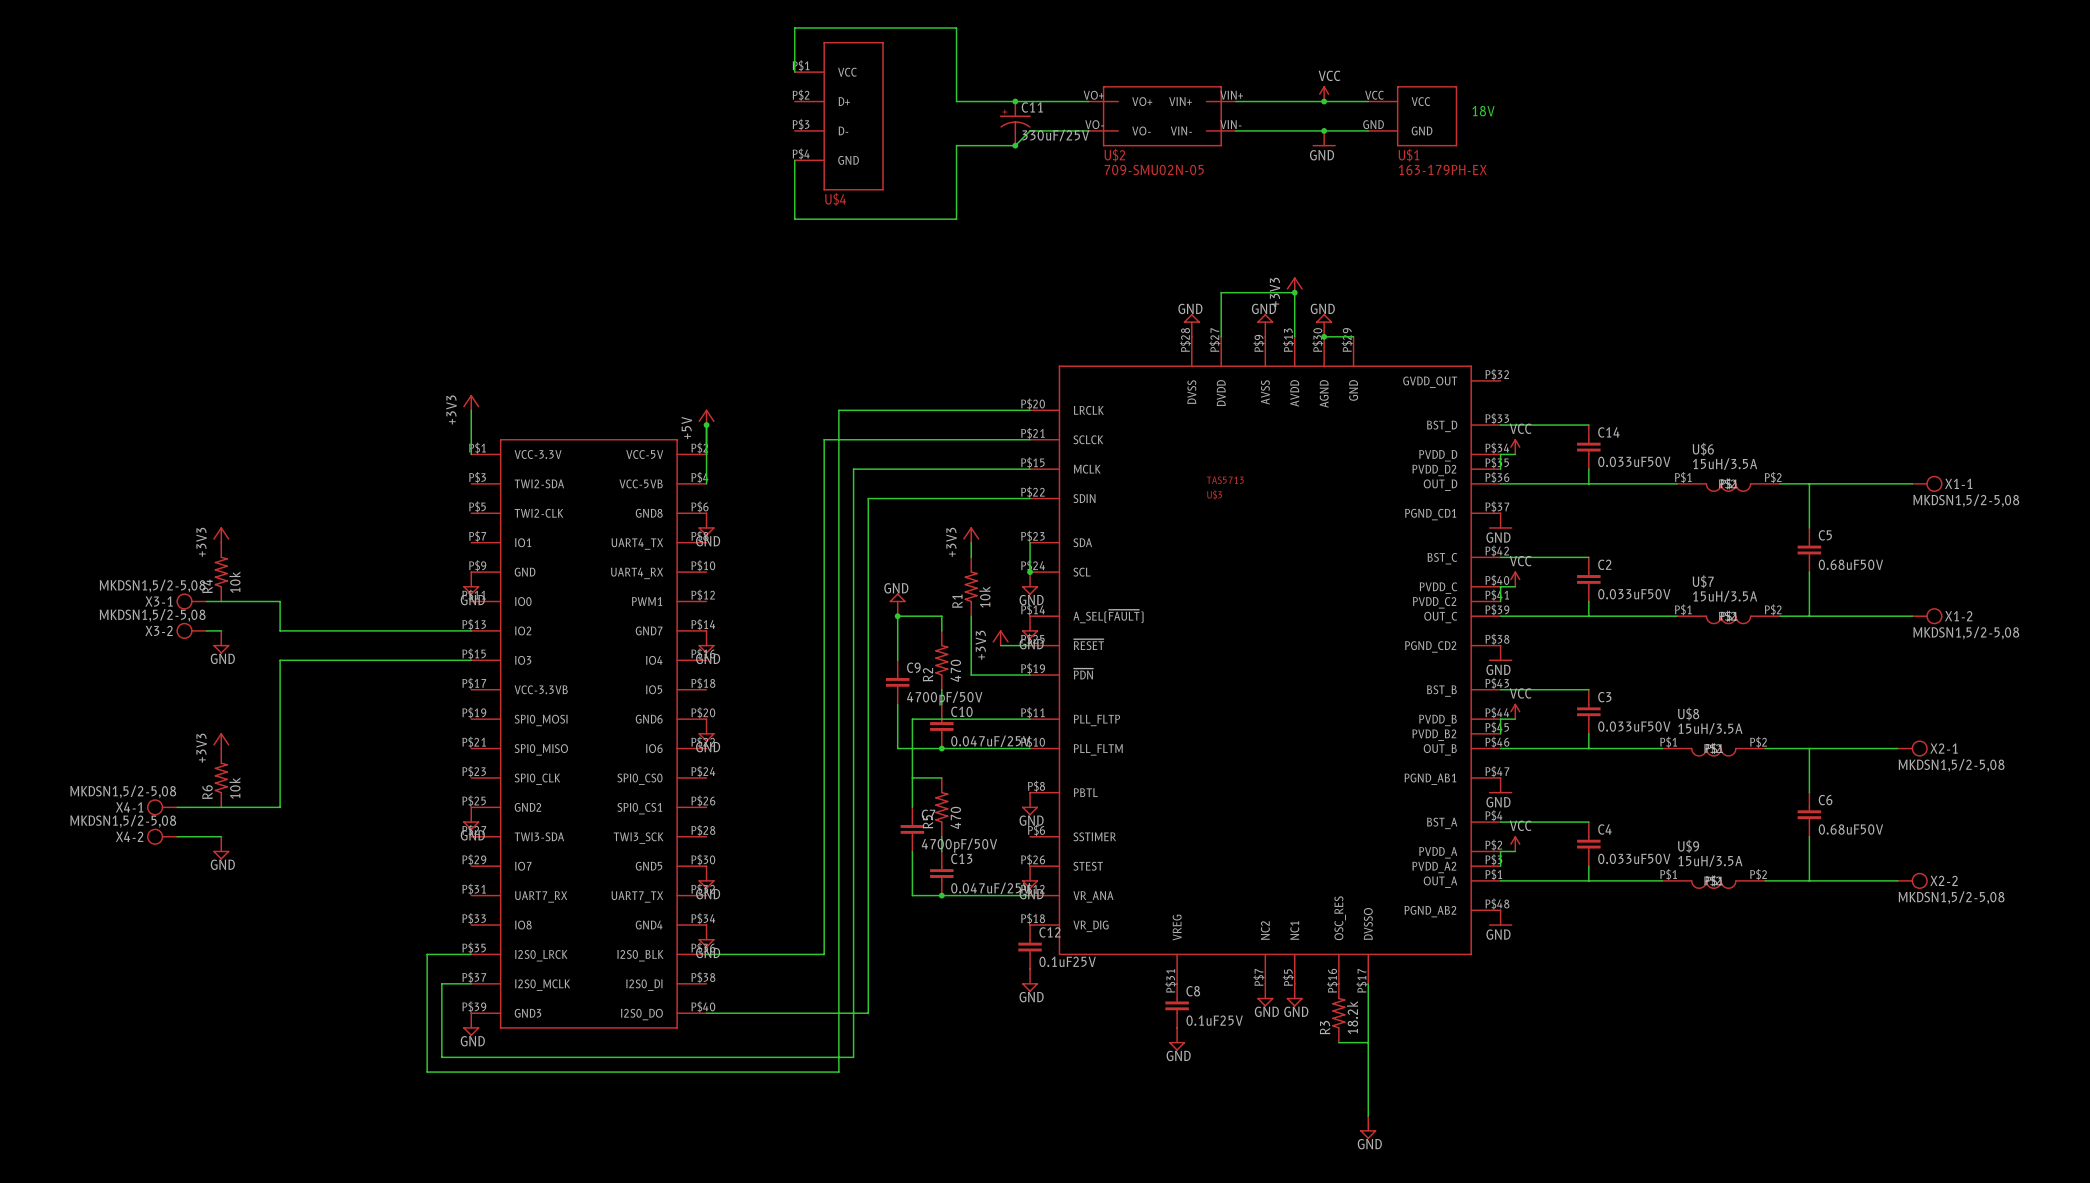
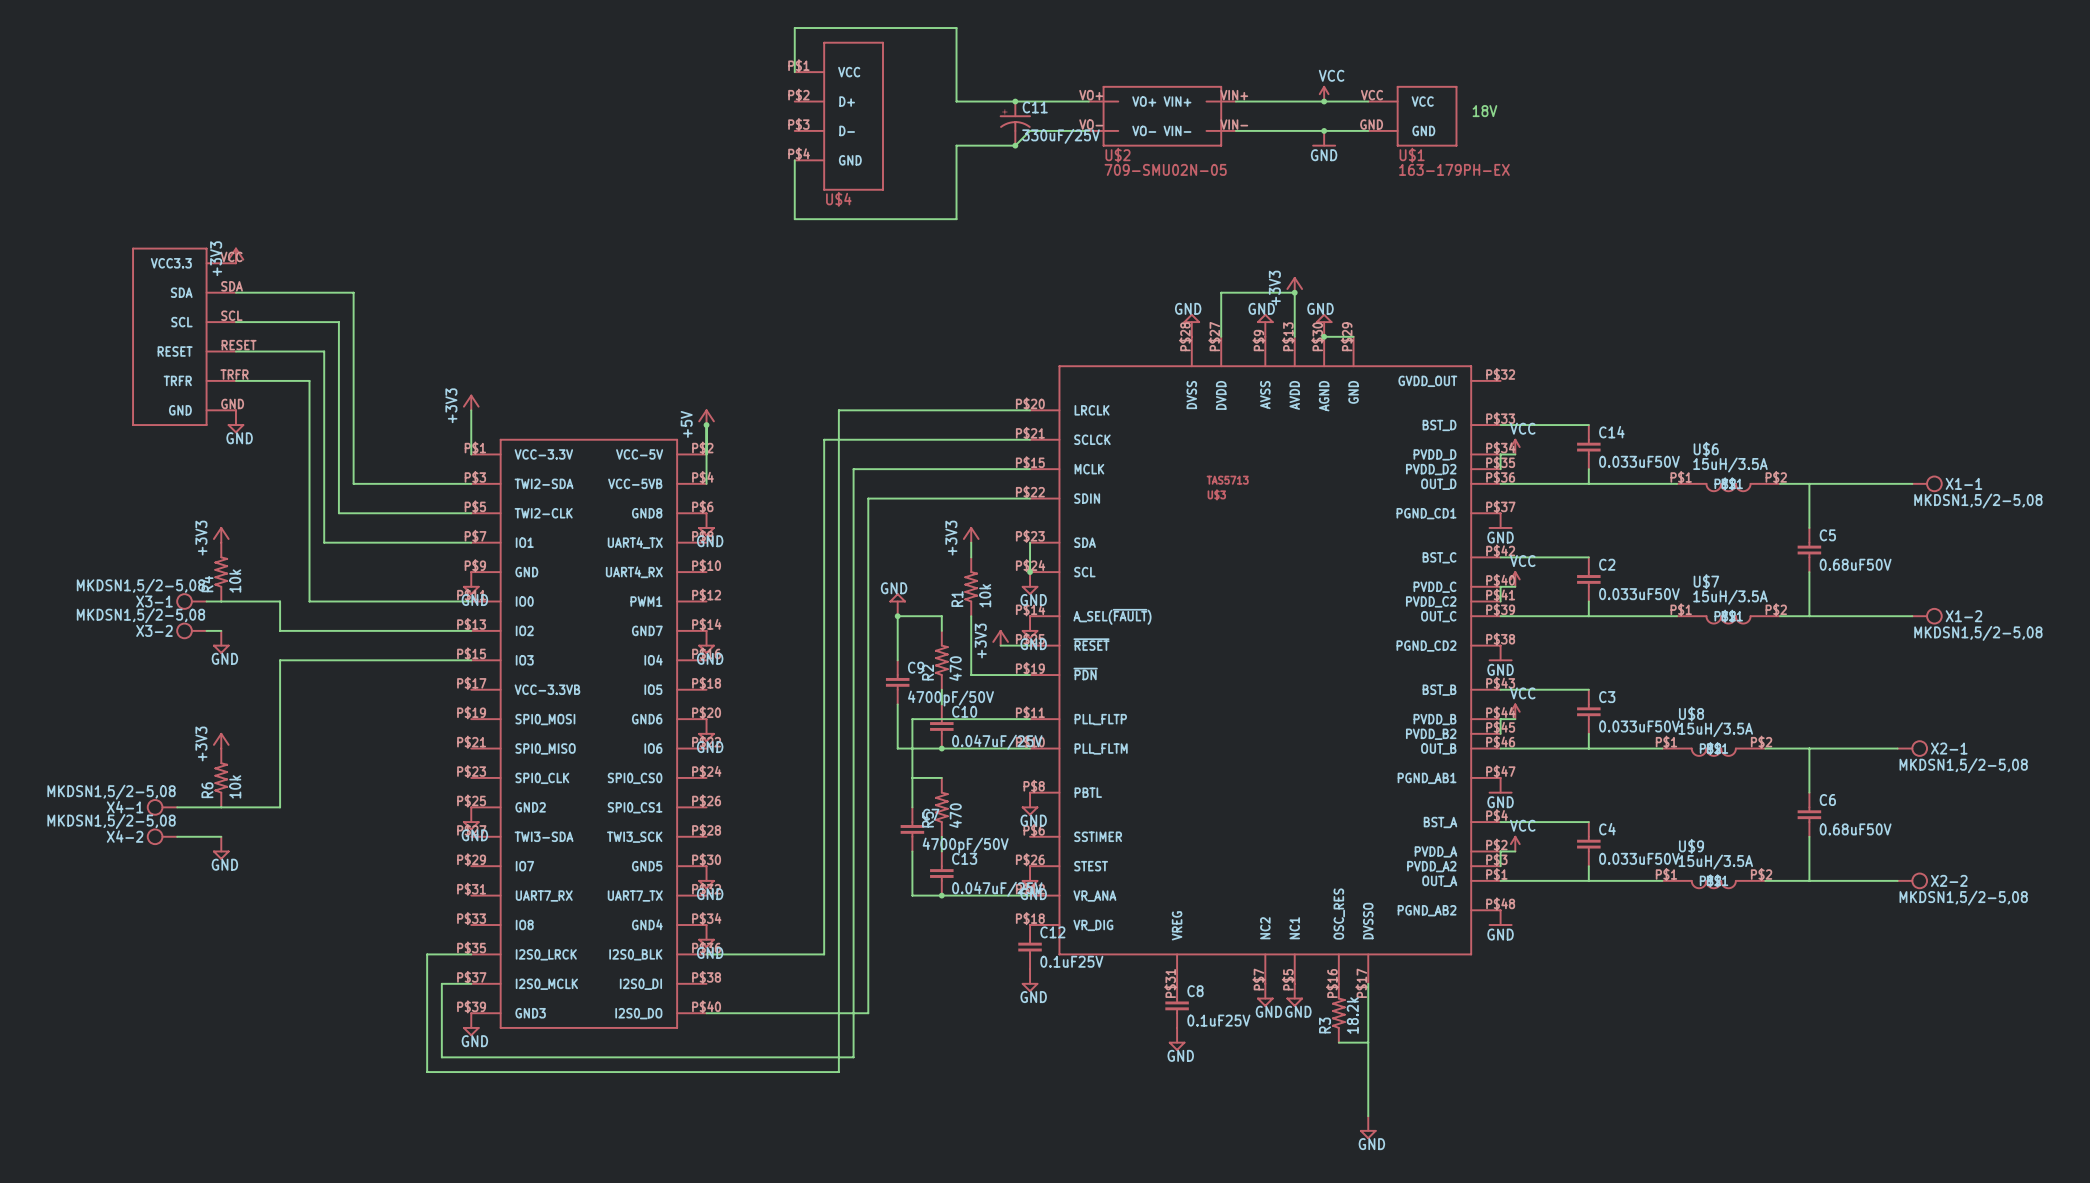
power symbol: none -> +3V3 (235, 255)
wire: none -> (235, 292) (353, 292) (353, 483) (471, 483)
wire: none -> (235, 322) (338, 322) (338, 513) (471, 513)
part: none -> (184, 336)
wire: none -> (235, 351) (324, 351) (324, 542) (471, 542)
wire: none -> (235, 380) (309, 380) (309, 601) (471, 601)
power symbol: none -> GND (235, 421)

